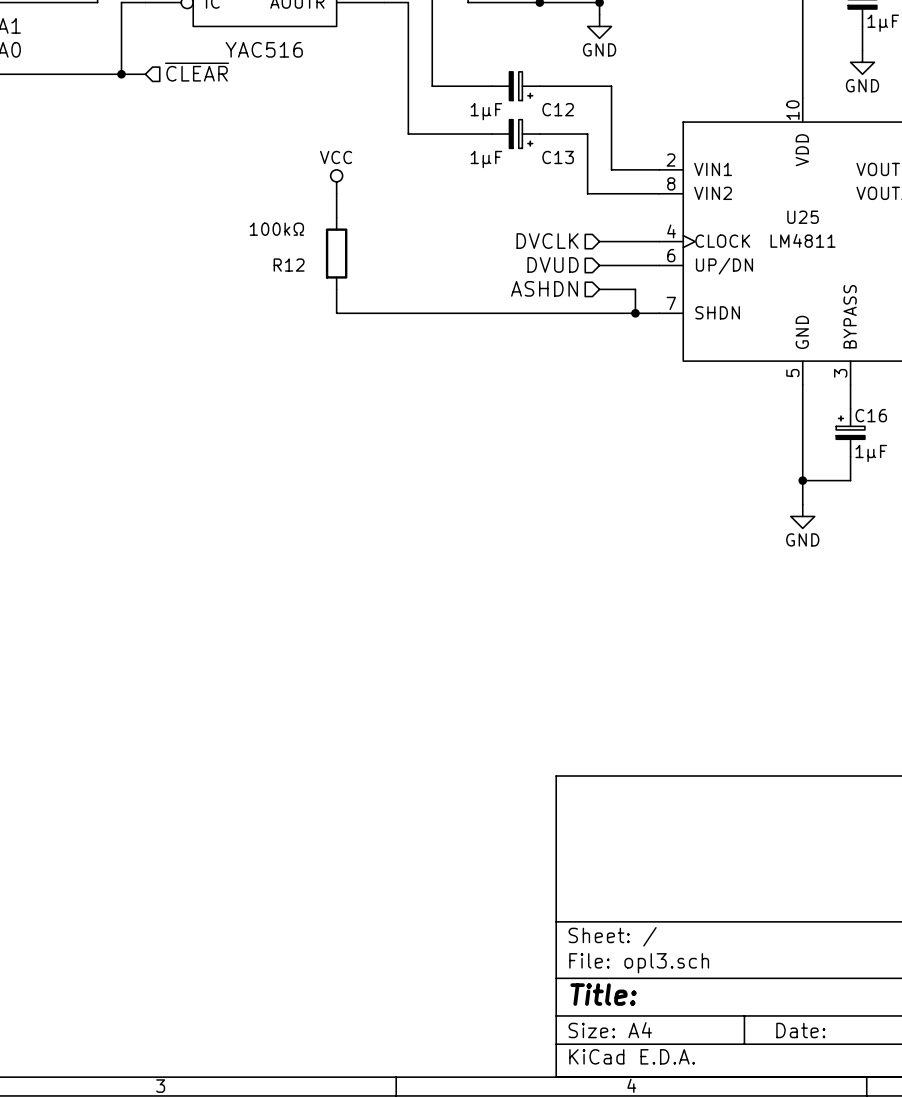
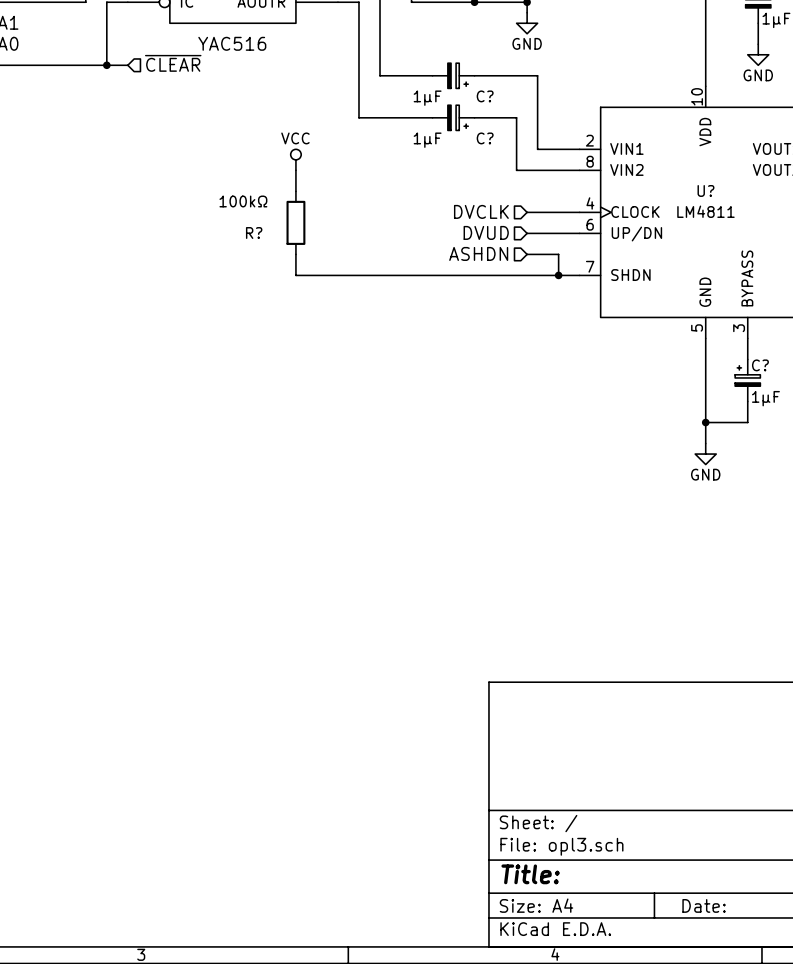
C12 name: C12 (558, 109) -> C? (485, 96)
C13 name: C13 (558, 157) -> C? (485, 138)
U25 name: U25 (803, 217) -> U? (705, 190)
R12 name: R12 (289, 265) -> R? (254, 233)
C16 name: C16 (871, 415) -> C? (760, 365)

